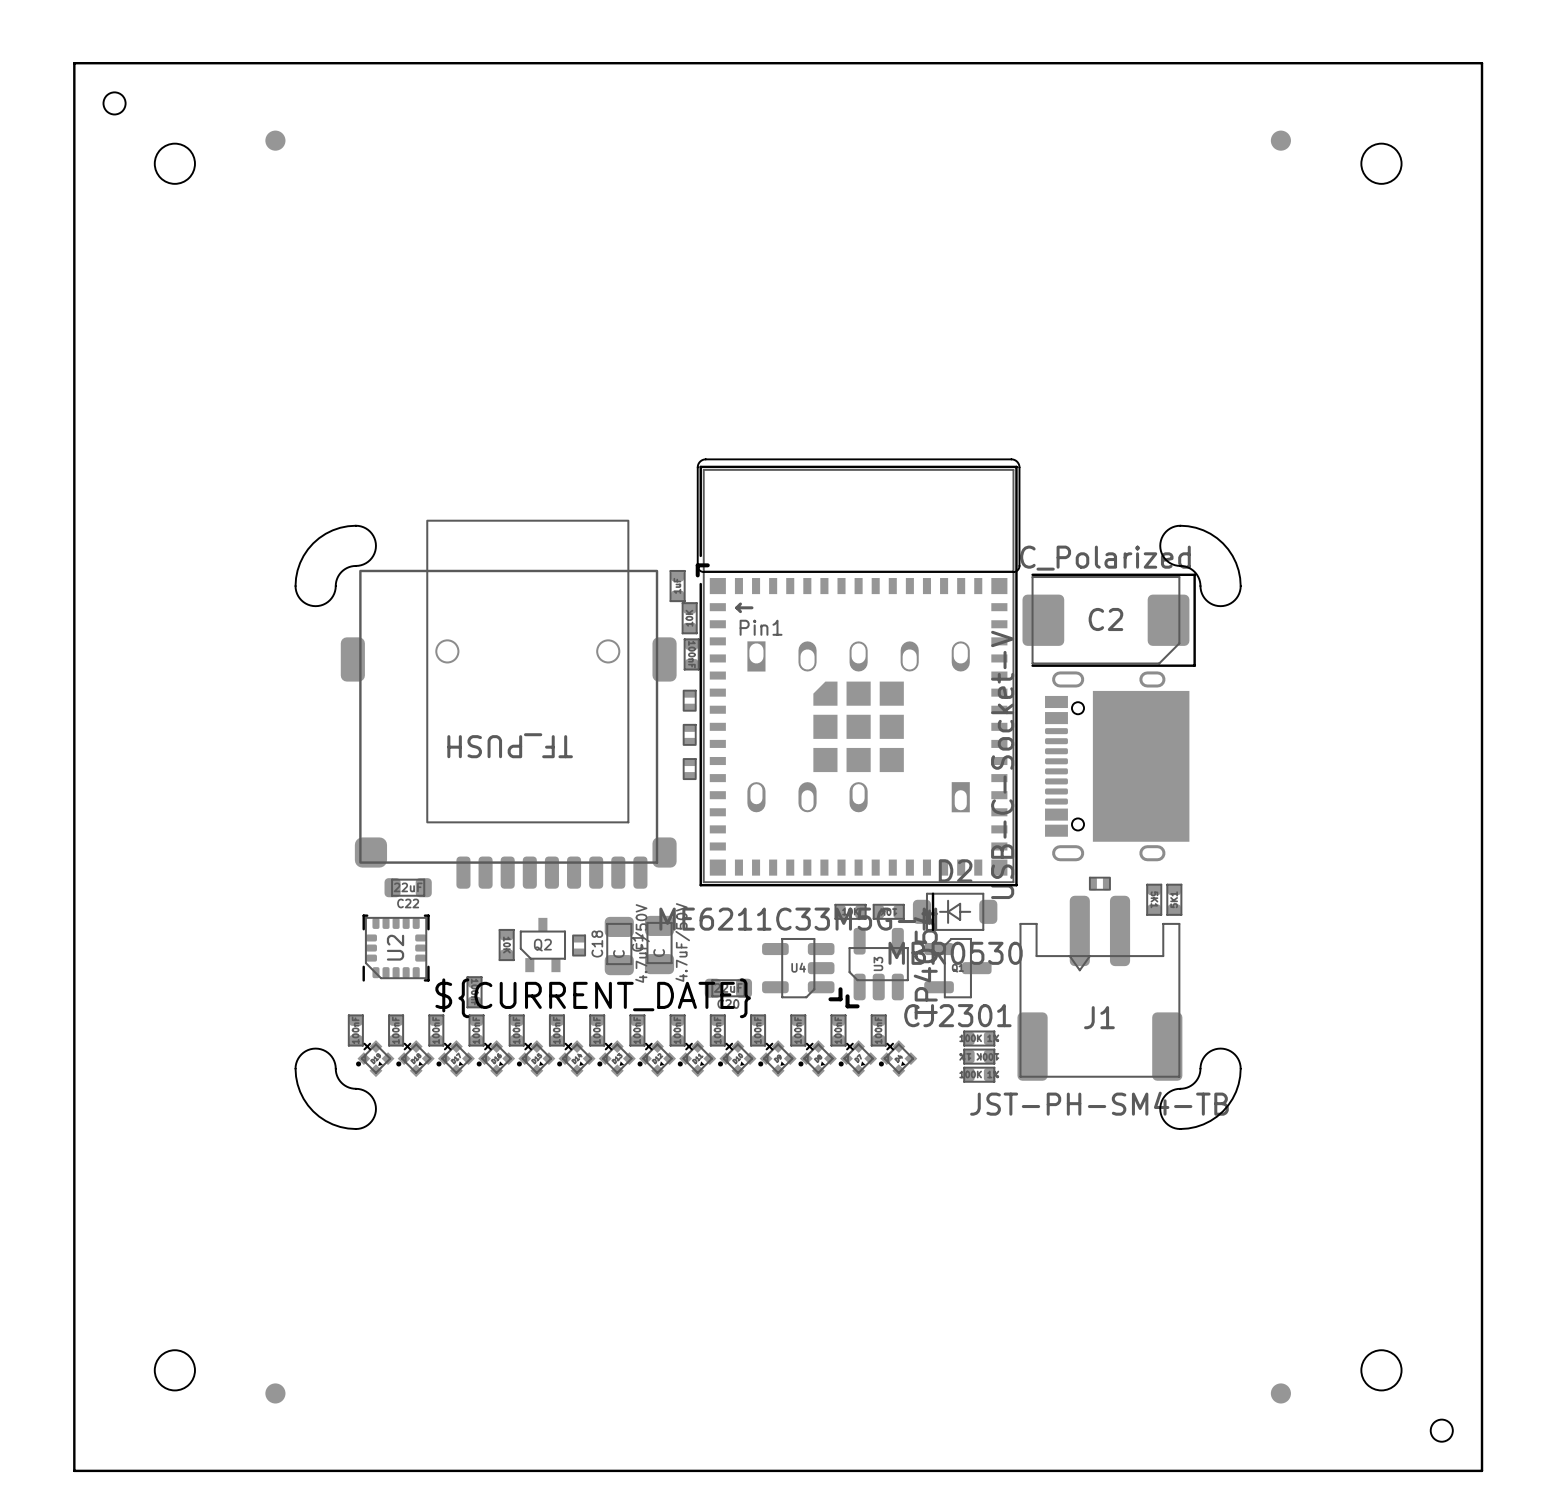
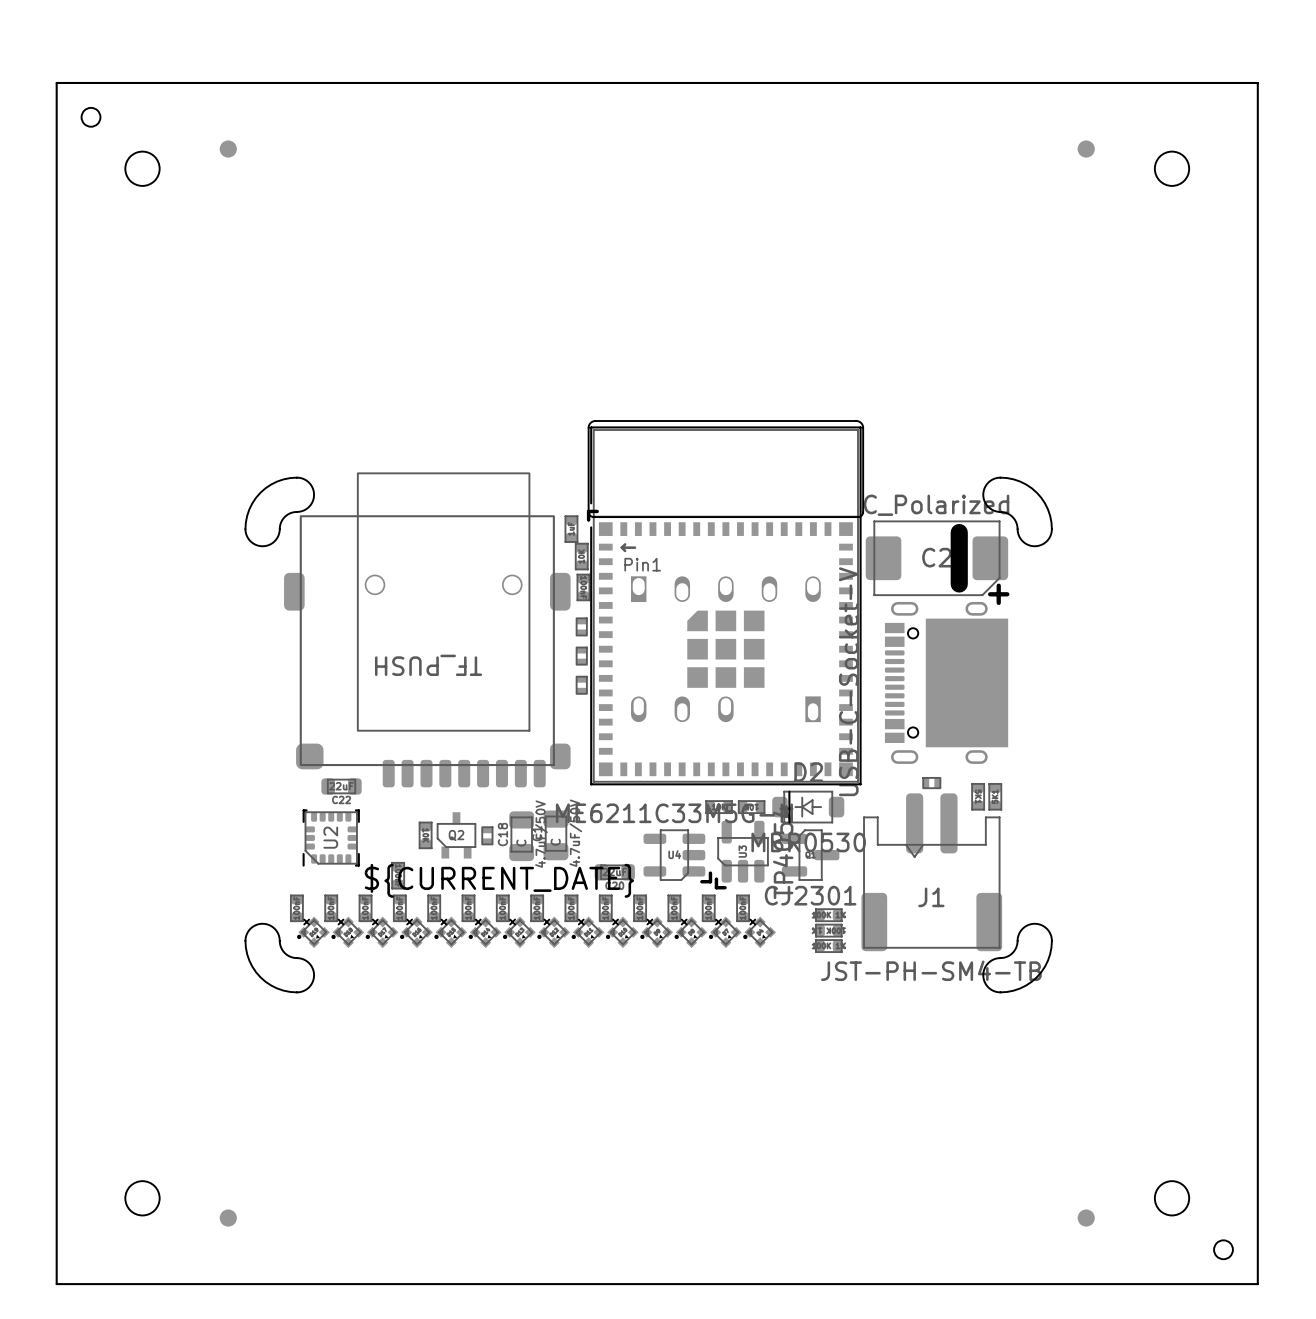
C2 footprint: [1022, 573, 1196, 667] -> [865, 520, 1010, 606]

